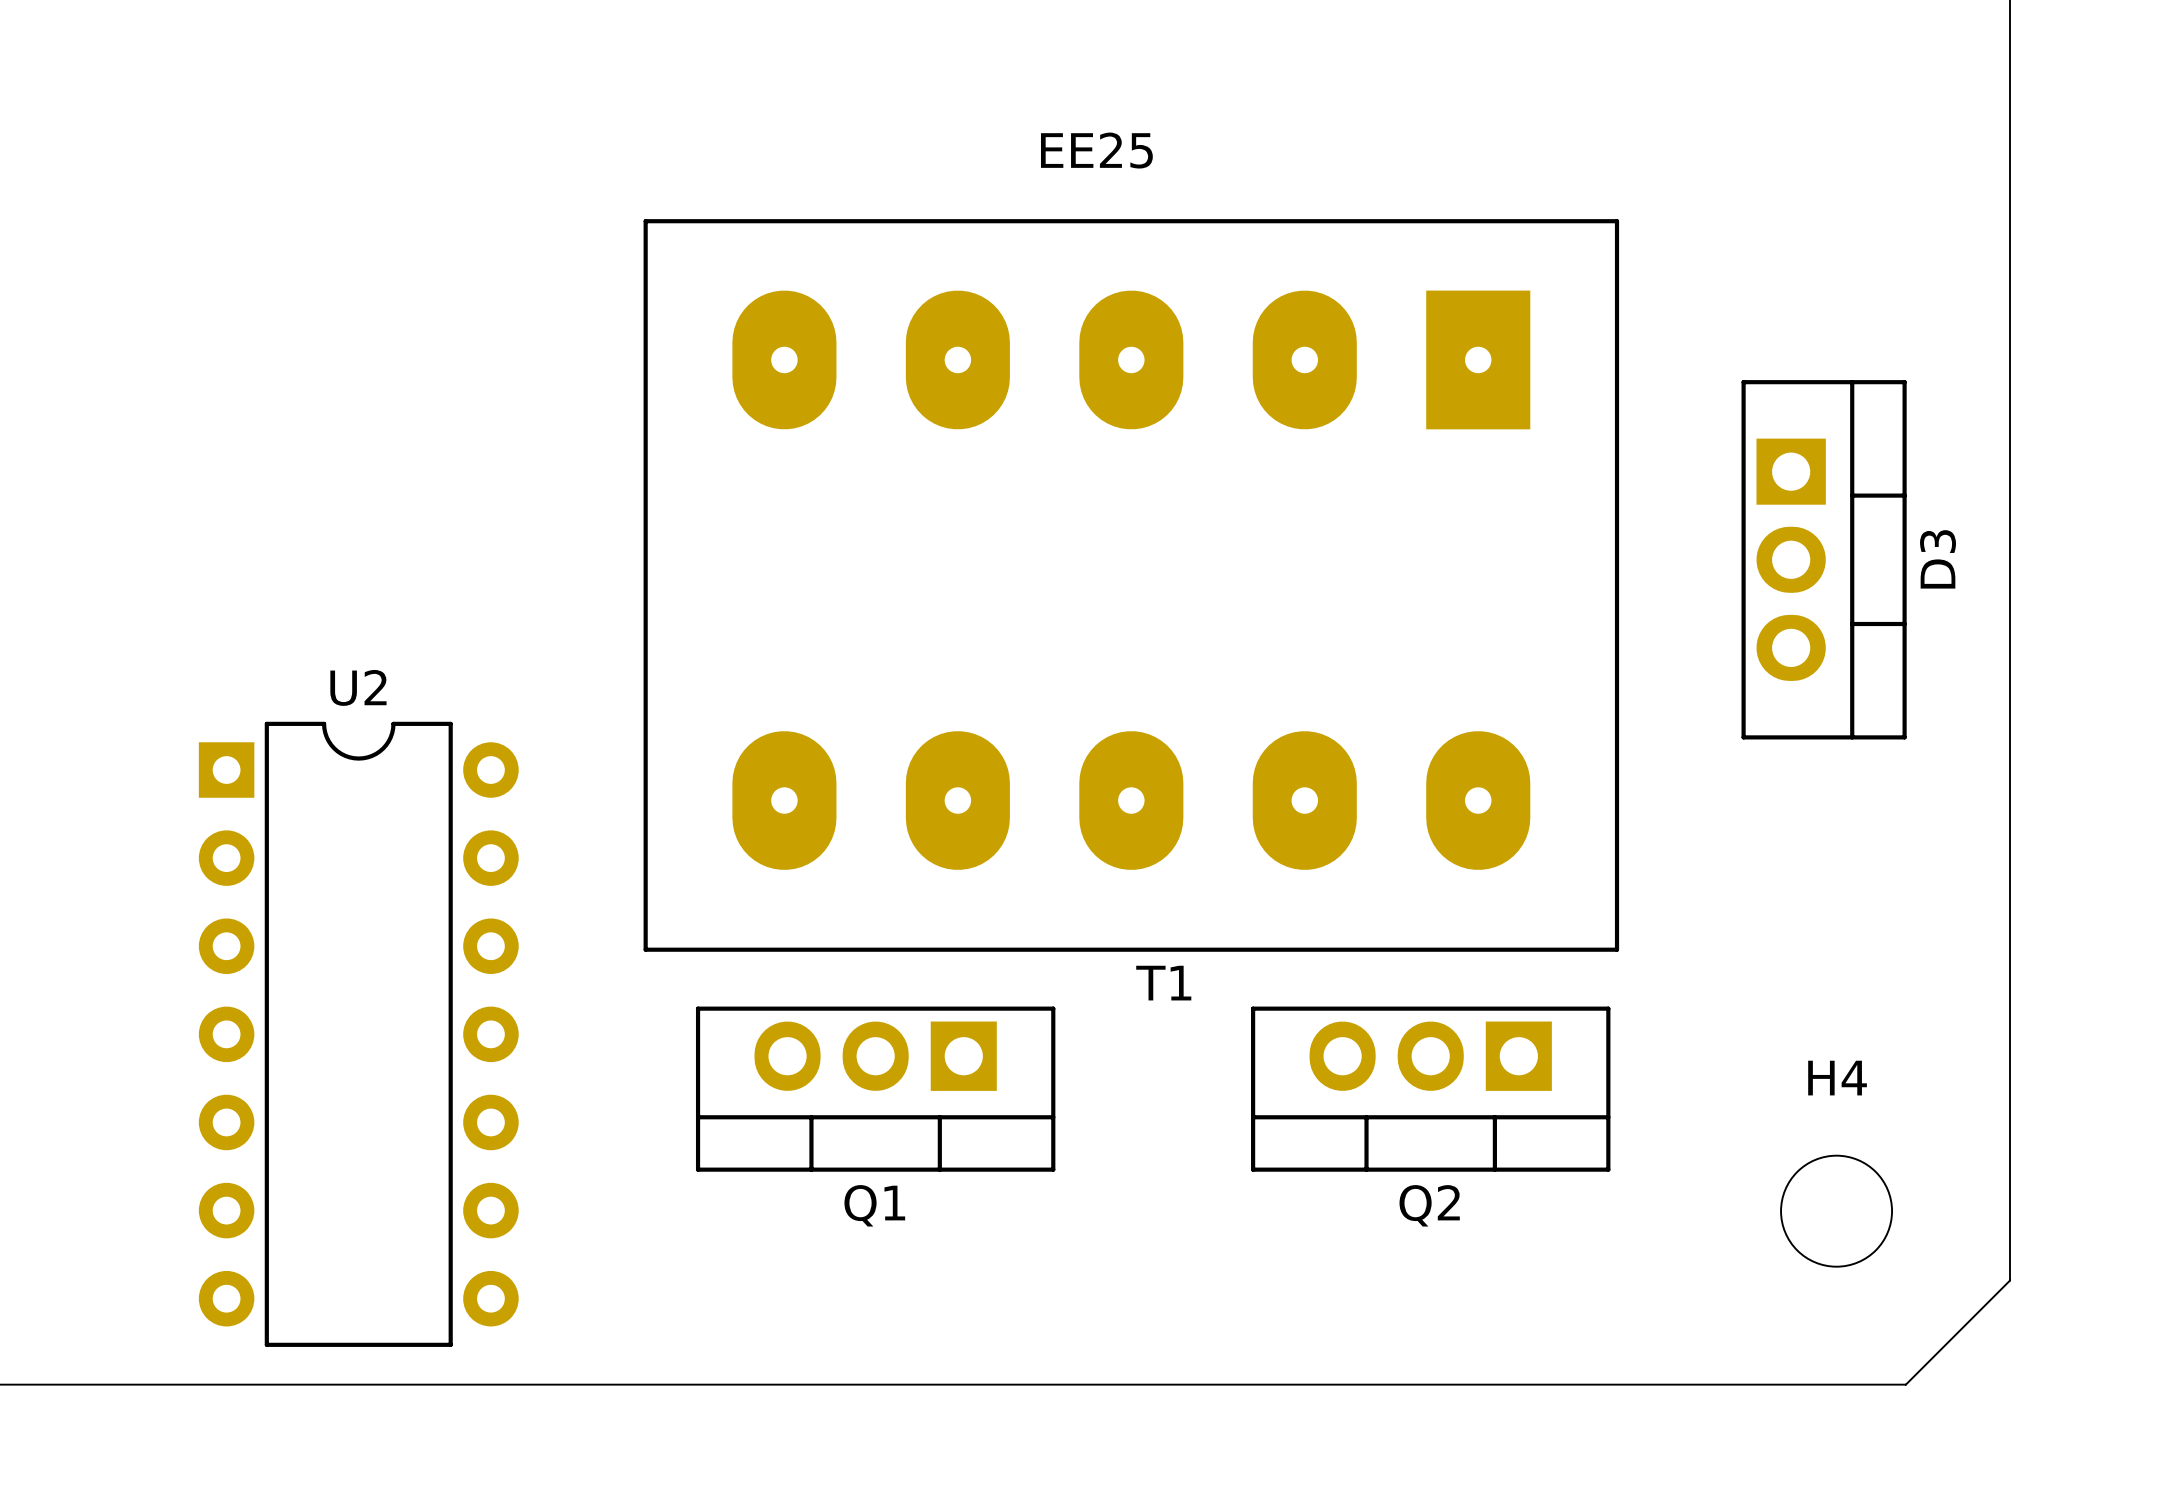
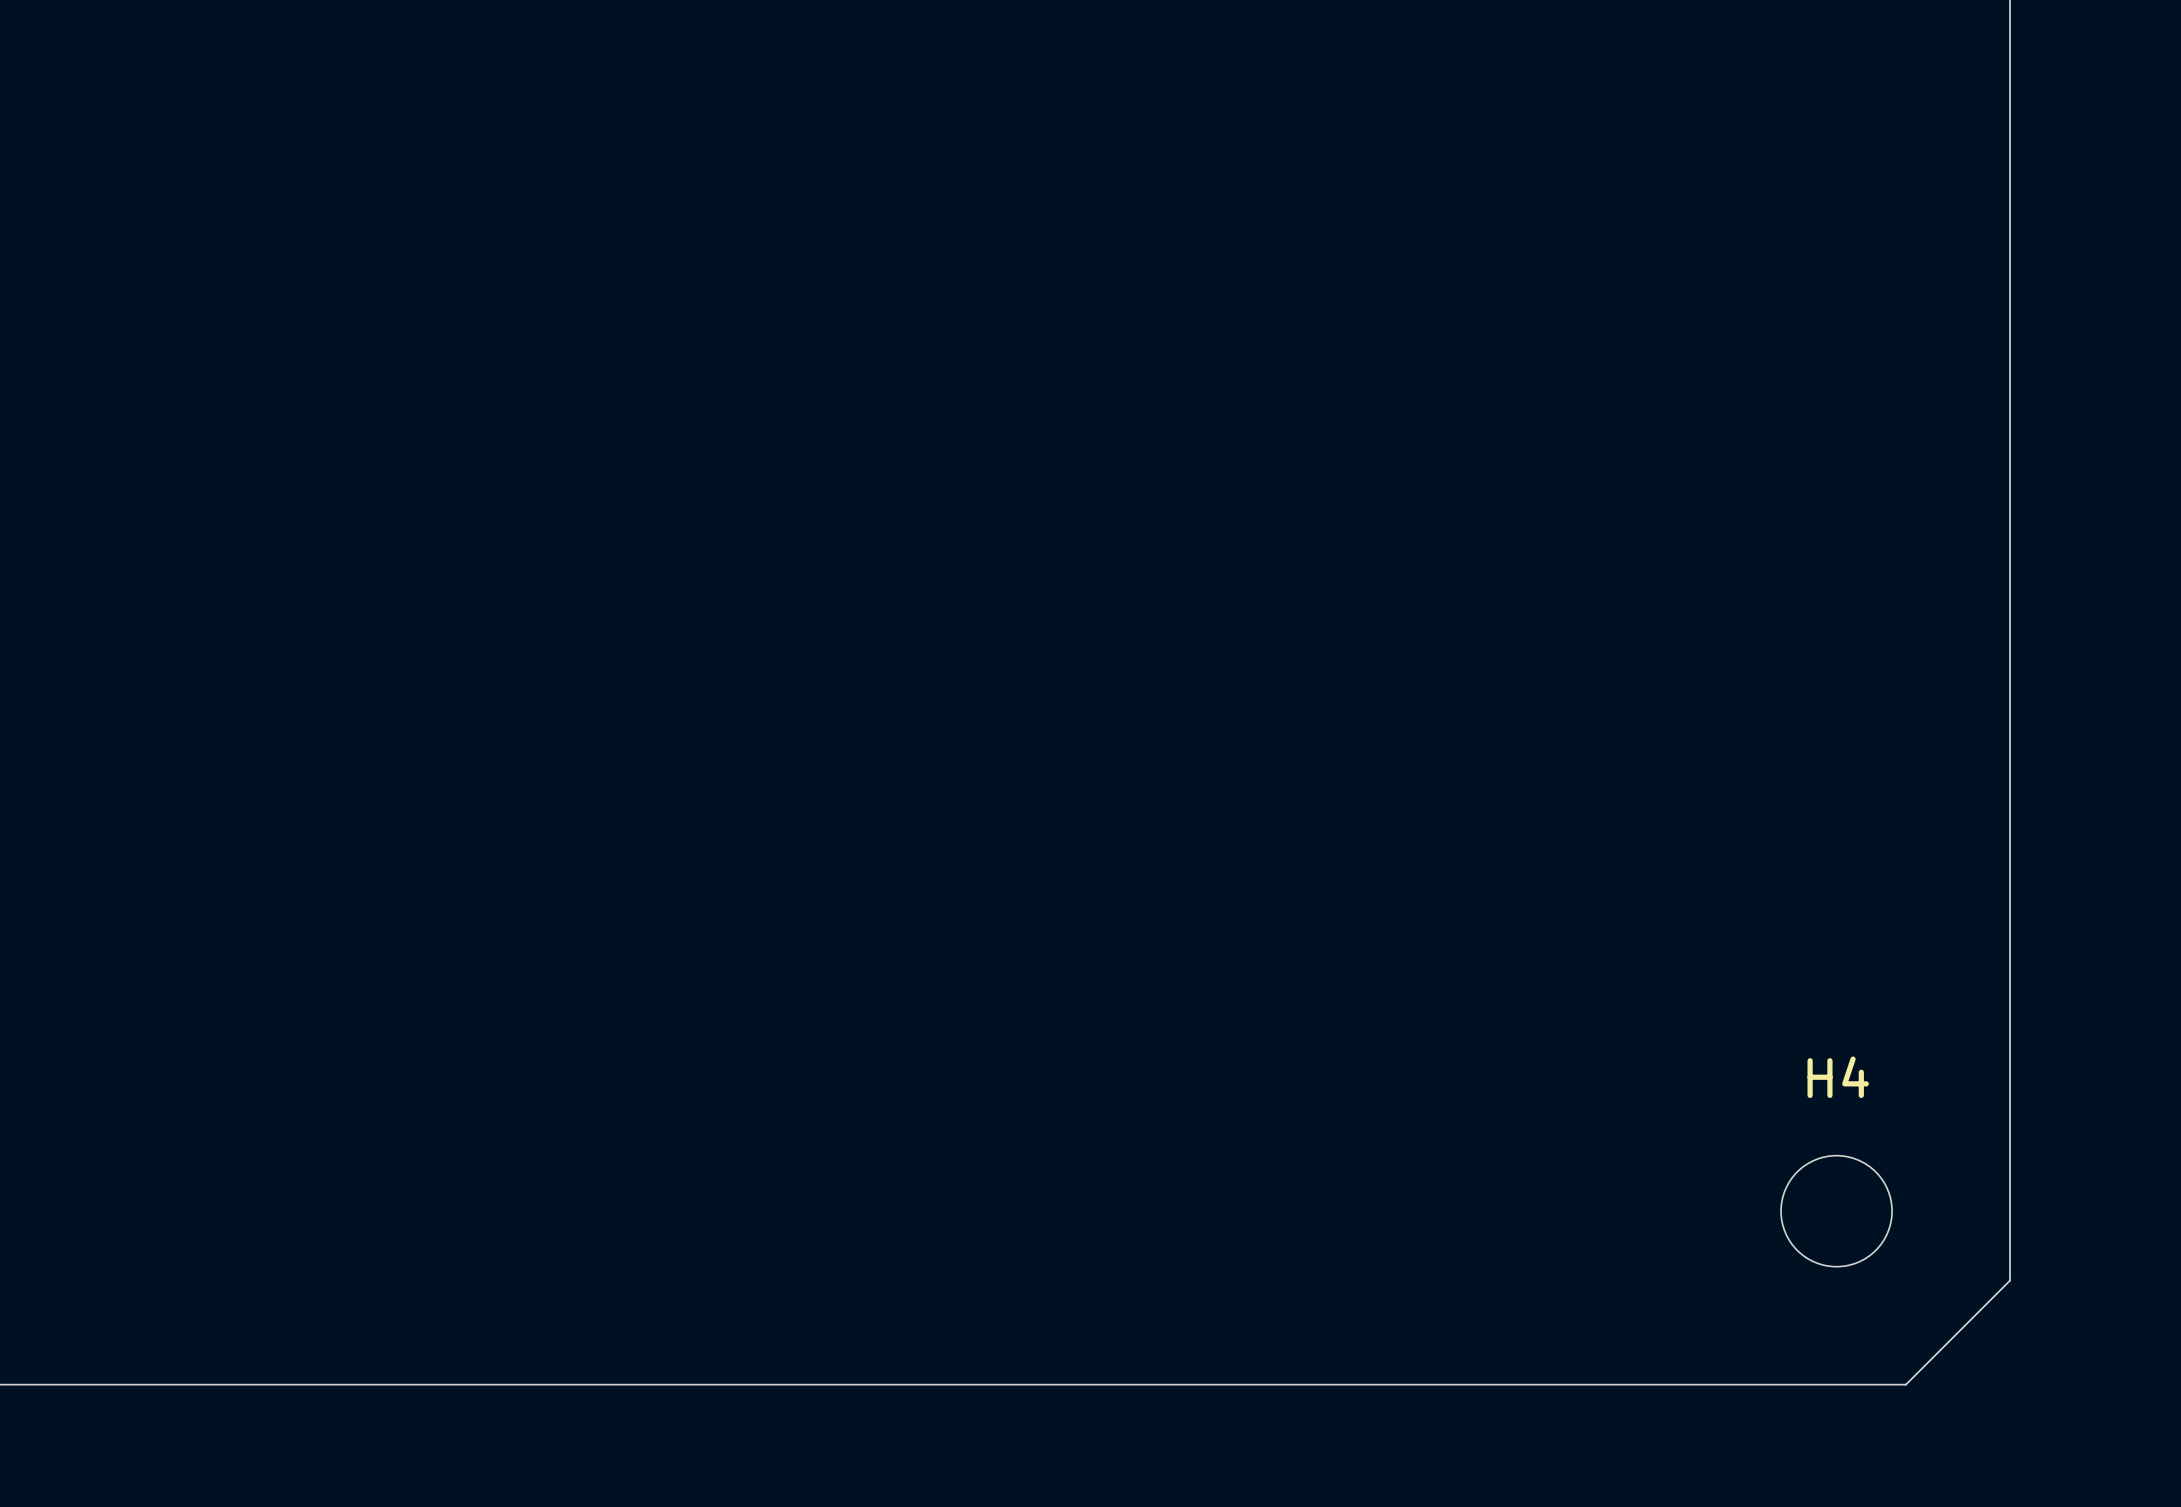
D3: (1824, 559) -> none
T1: (1131, 585) -> none
U2: (358, 1034) -> none
Q1: (875, 1089) -> none
Q2: (1430, 1089) -> none

